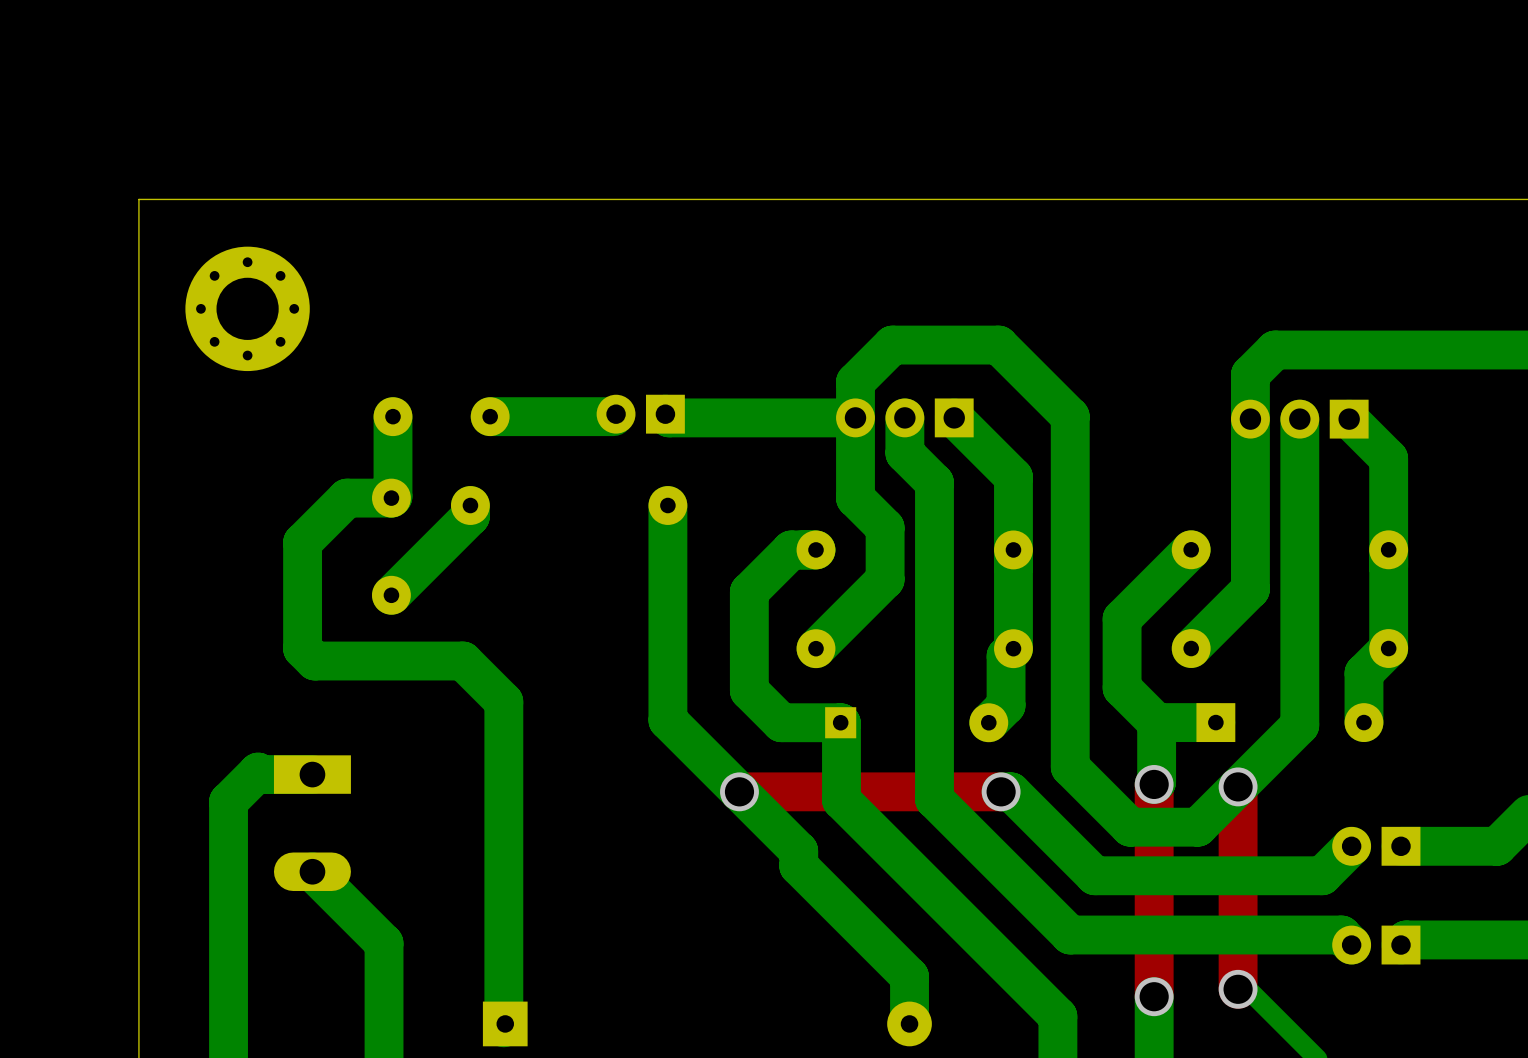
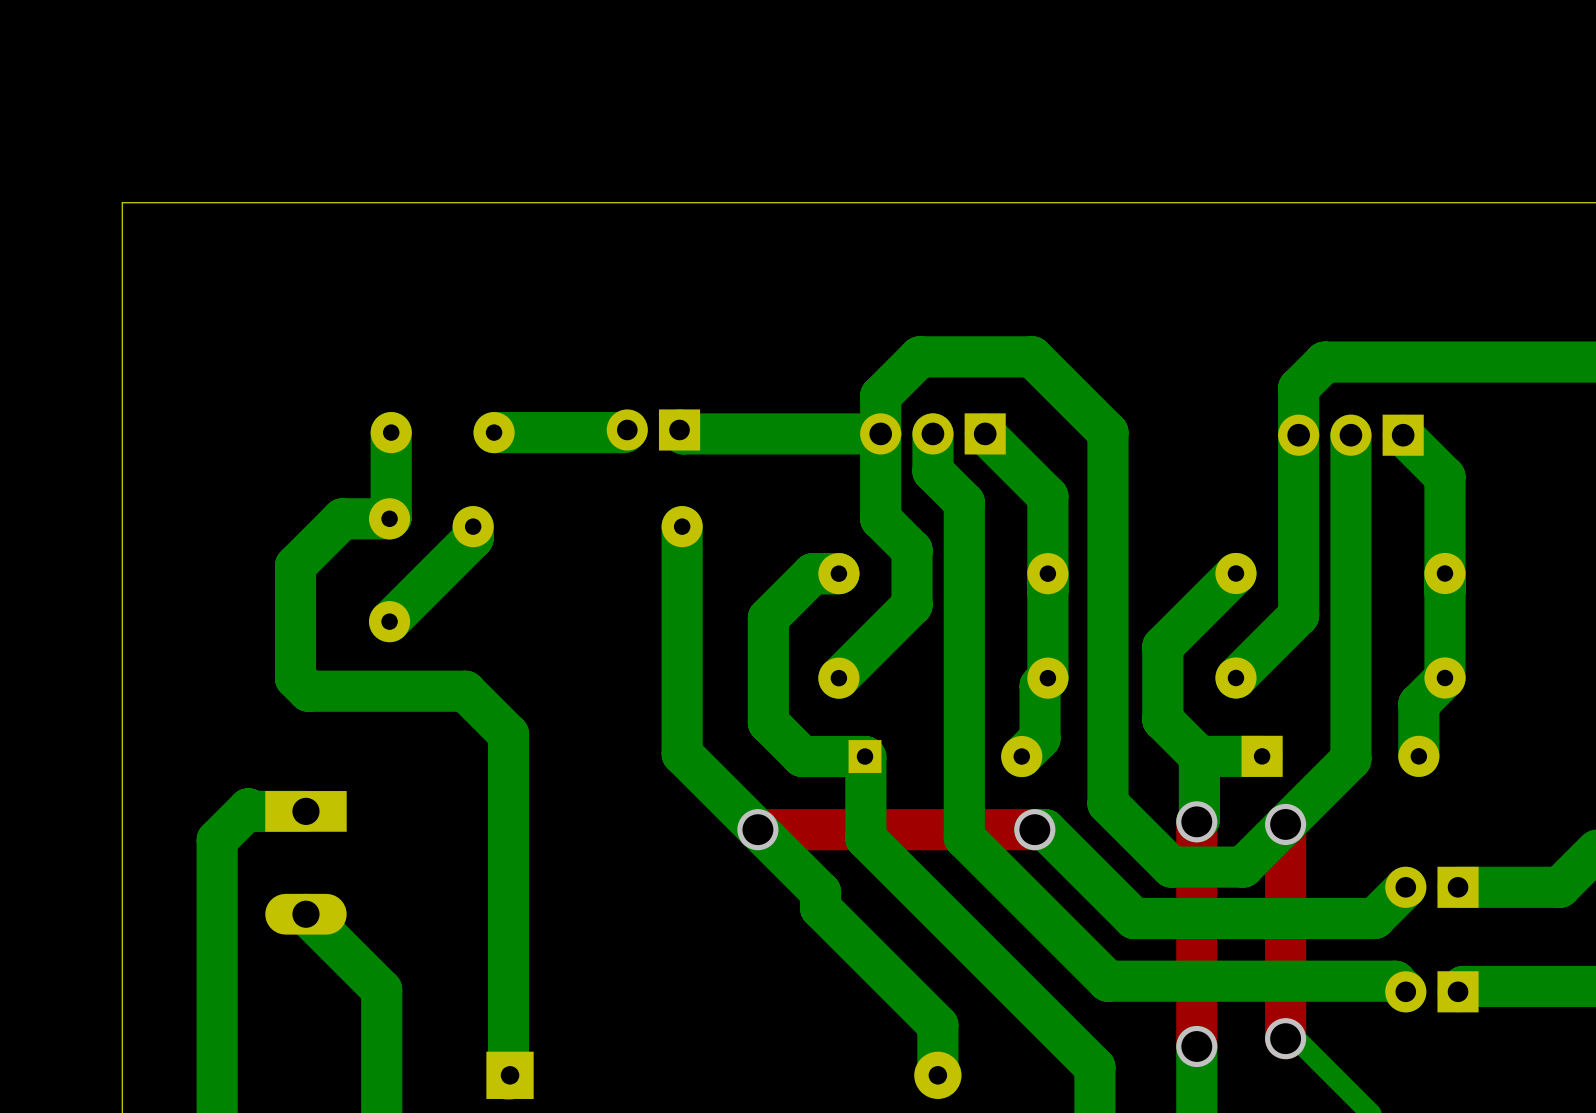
part: (247, 308) -> none

